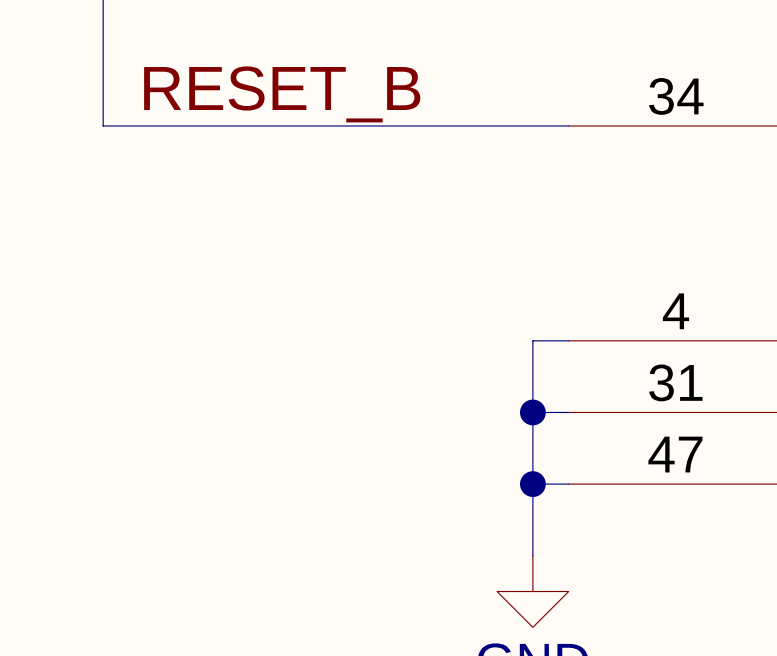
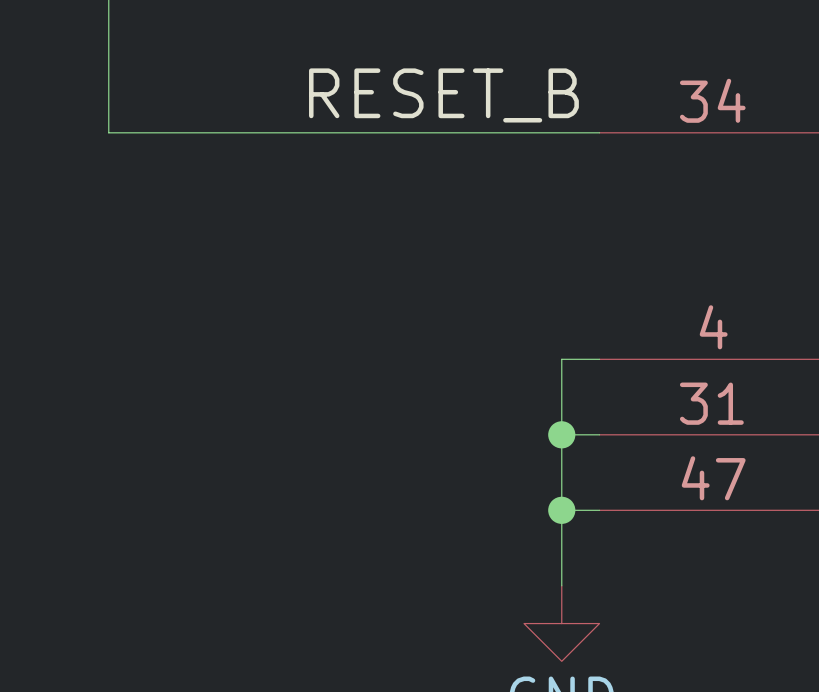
label position: RESET_B (282, 94) -> RESET_B (443, 95)

